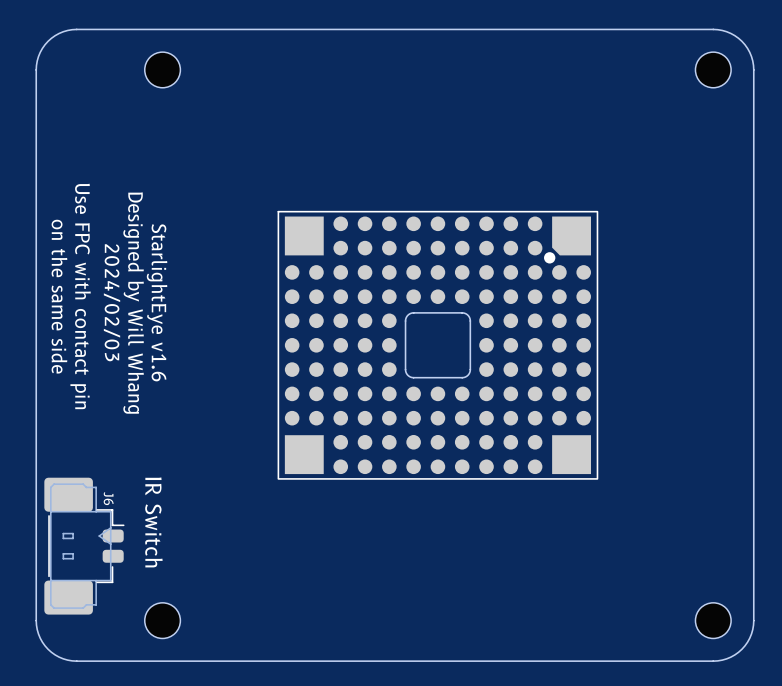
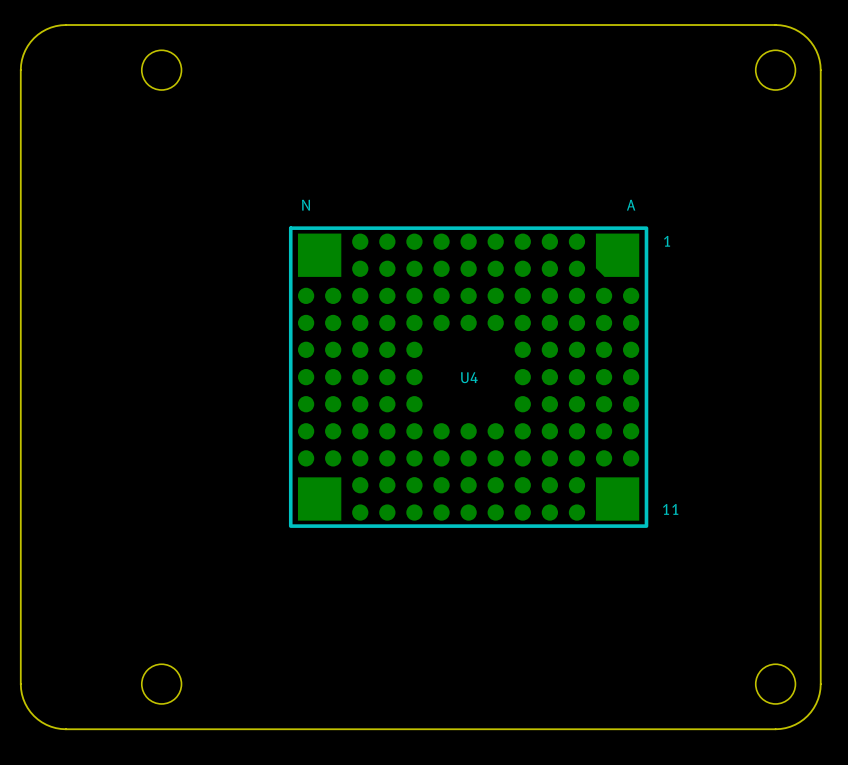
text: on the same side (59, 296) -> none
text: Use FPC with contact pin (80, 296) -> none
text: 2024/02/03 (112, 302) -> none
text: StarlightEye v1.6 (157, 302) -> none
text: Designed by Will Whang (133, 303) -> none
board edge: (462, 312) (413, 312) (407, 316) (405, 321) (405, 369) (408, 376) (413, 377) (462, 377) (468, 374) (470, 369) (470, 319) (467, 315) (462, 312) -> none
part: (437, 345) -> none
U4: none -> (468, 377)
text: IR Switch (153, 522) -> none
J6: (84, 546) -> none

